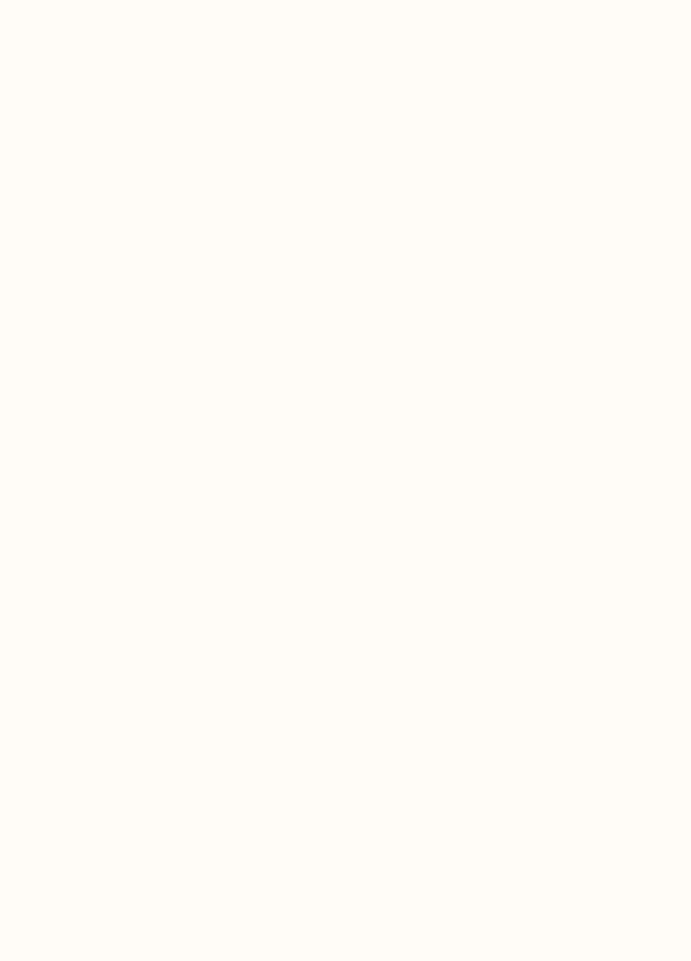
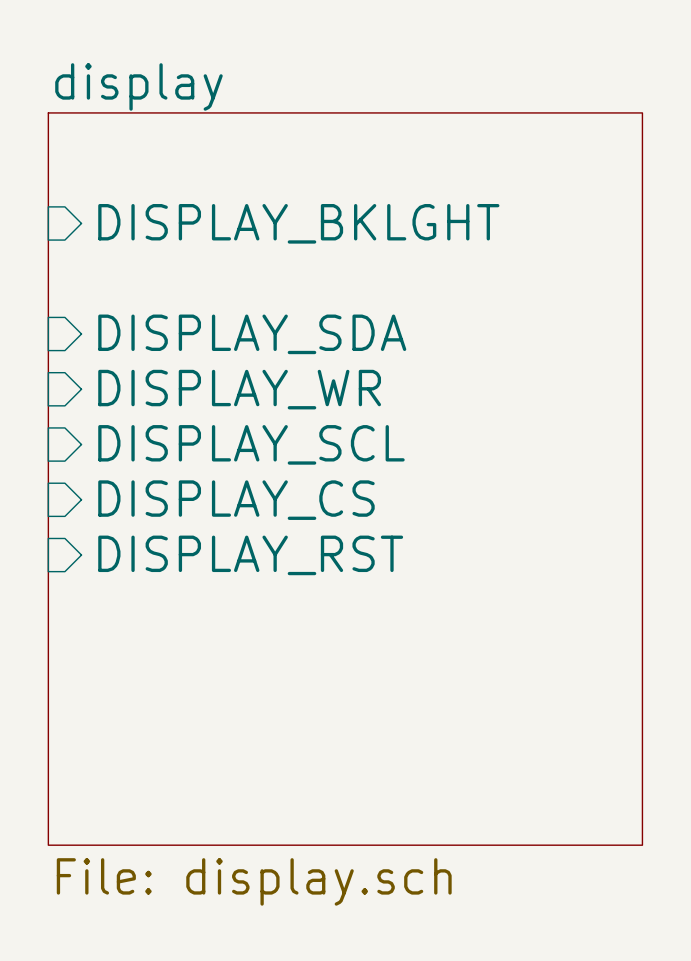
sheet pin: none -> DISPLAY_BKLGHT (298, 223)
sheet pin: none -> DISPLAY_SDA (252, 334)
sheet pin: none -> DISPLAY_WR (239, 389)
sheet pin: none -> DISPLAY_SCL (251, 444)
sheet display: none -> File: display.sch (345, 479)
sheet pin: none -> DISPLAY_CS (236, 500)
sheet pin: none -> DISPLAY_RST (250, 555)

